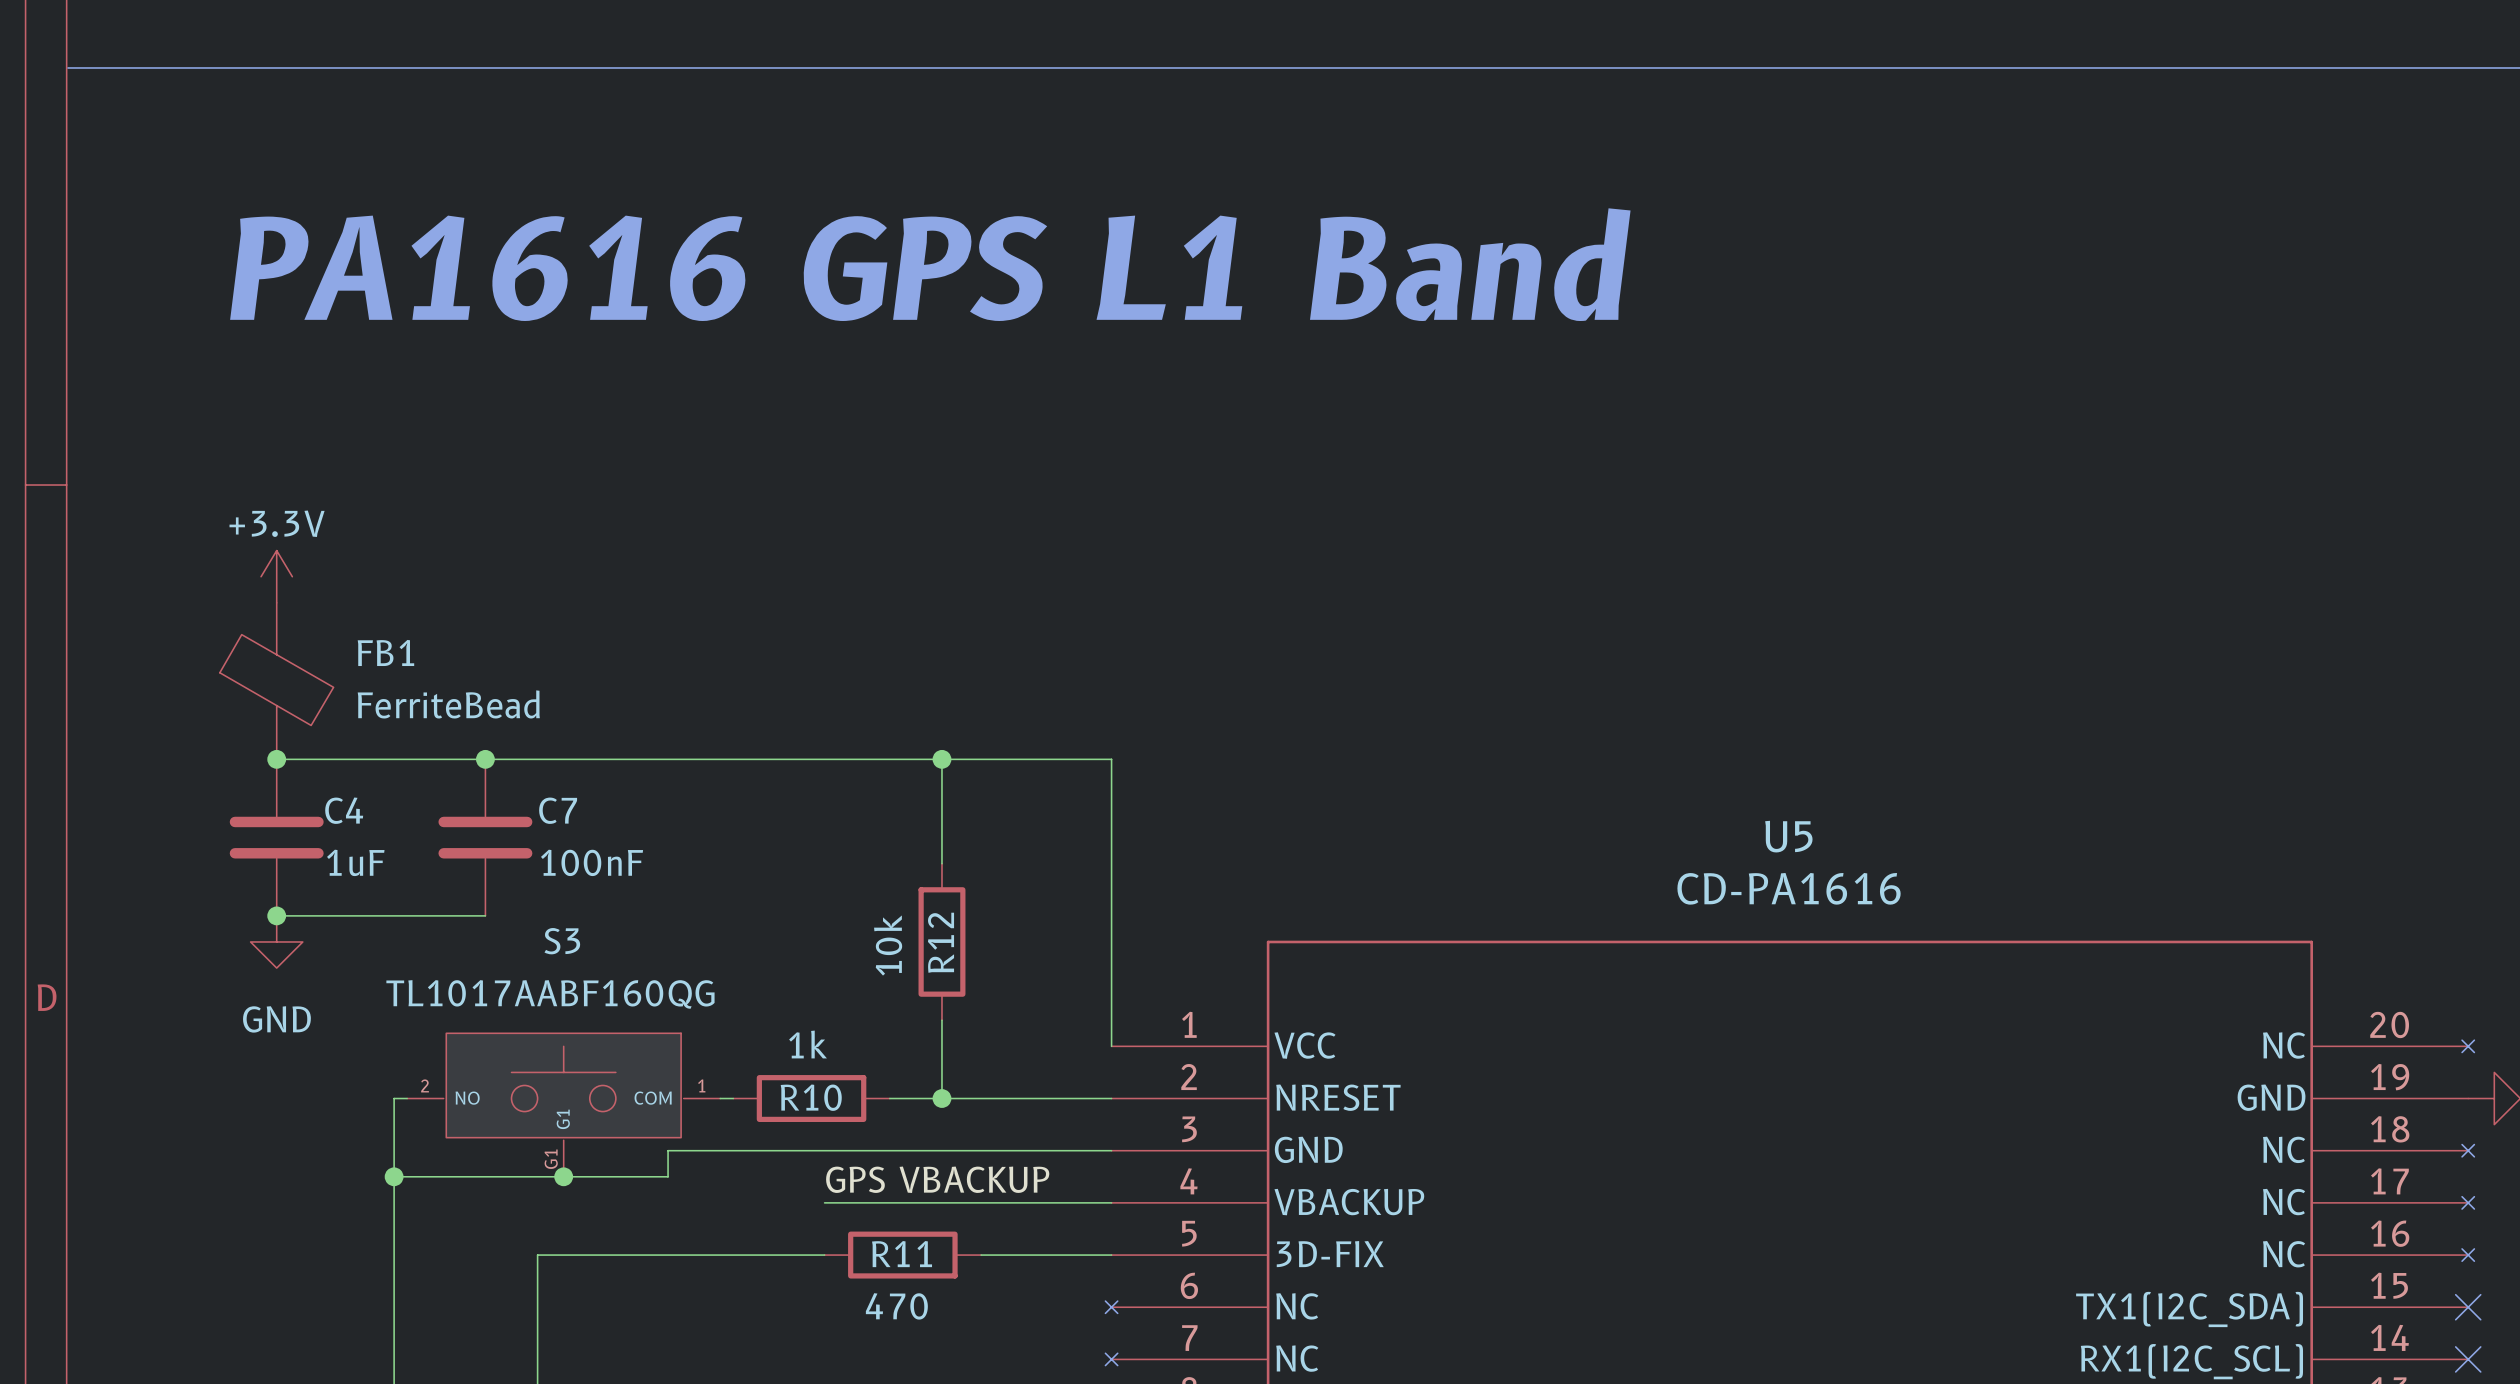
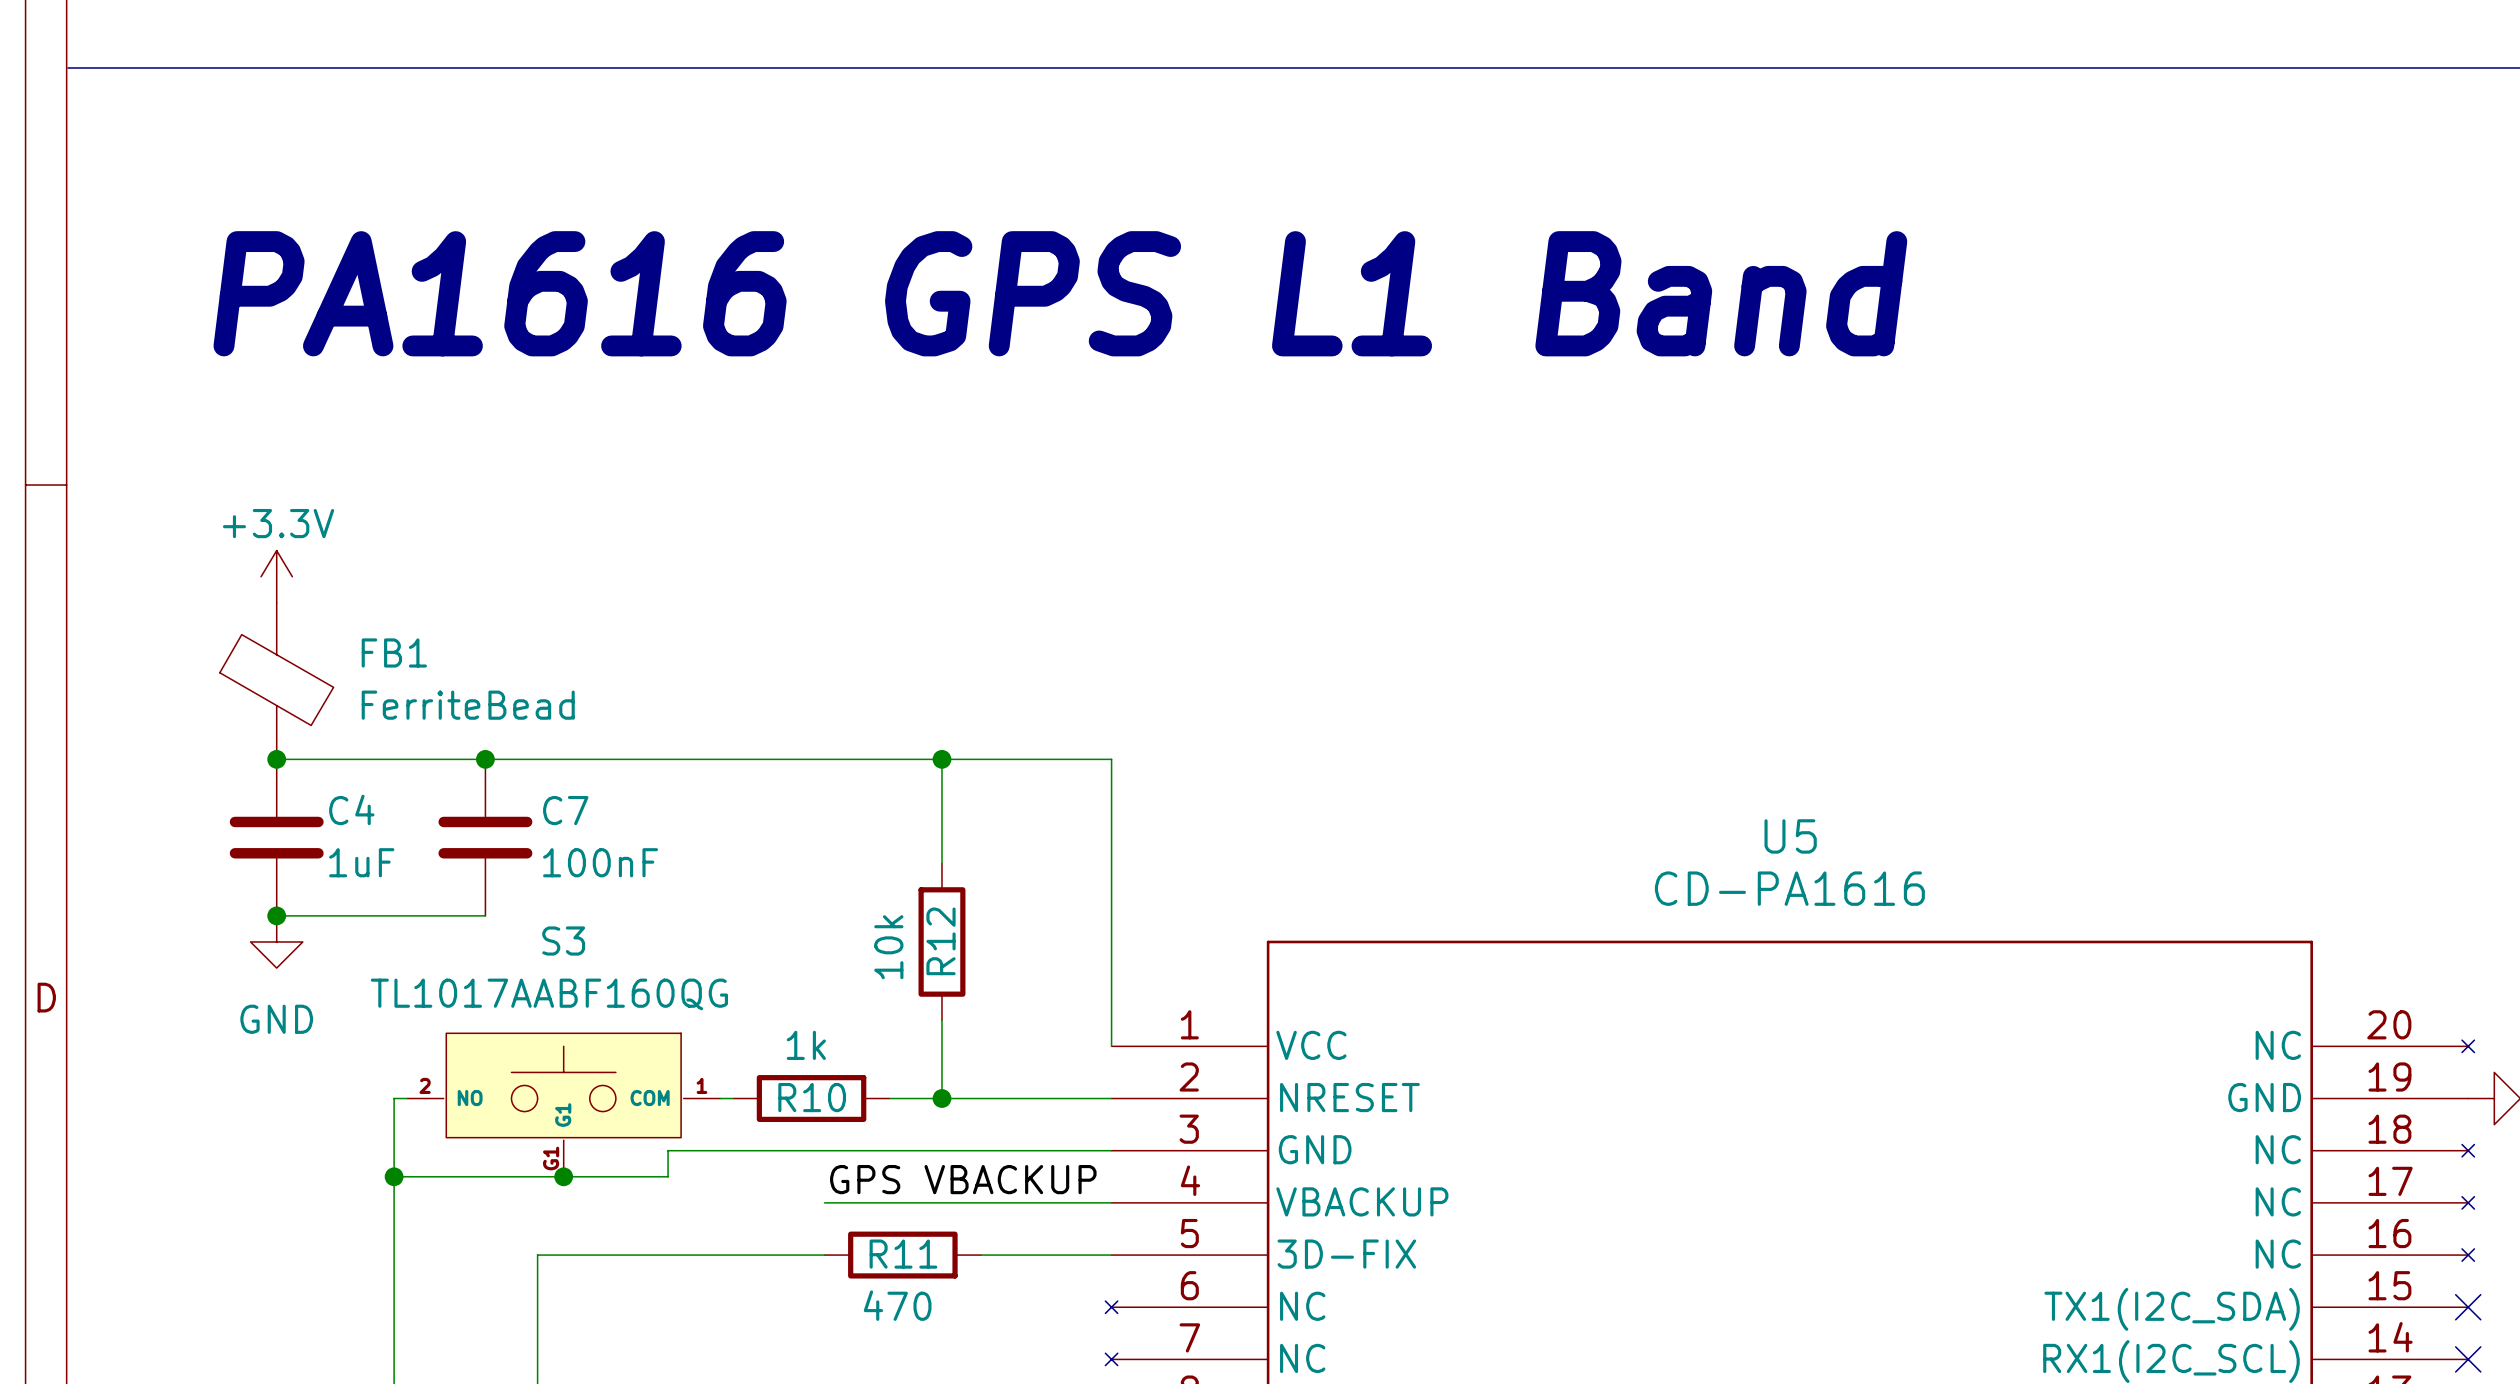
text position: PA1616 GPS L1 Band (930, 264) -> PA1616 GPS L1 Band (1060, 293)

